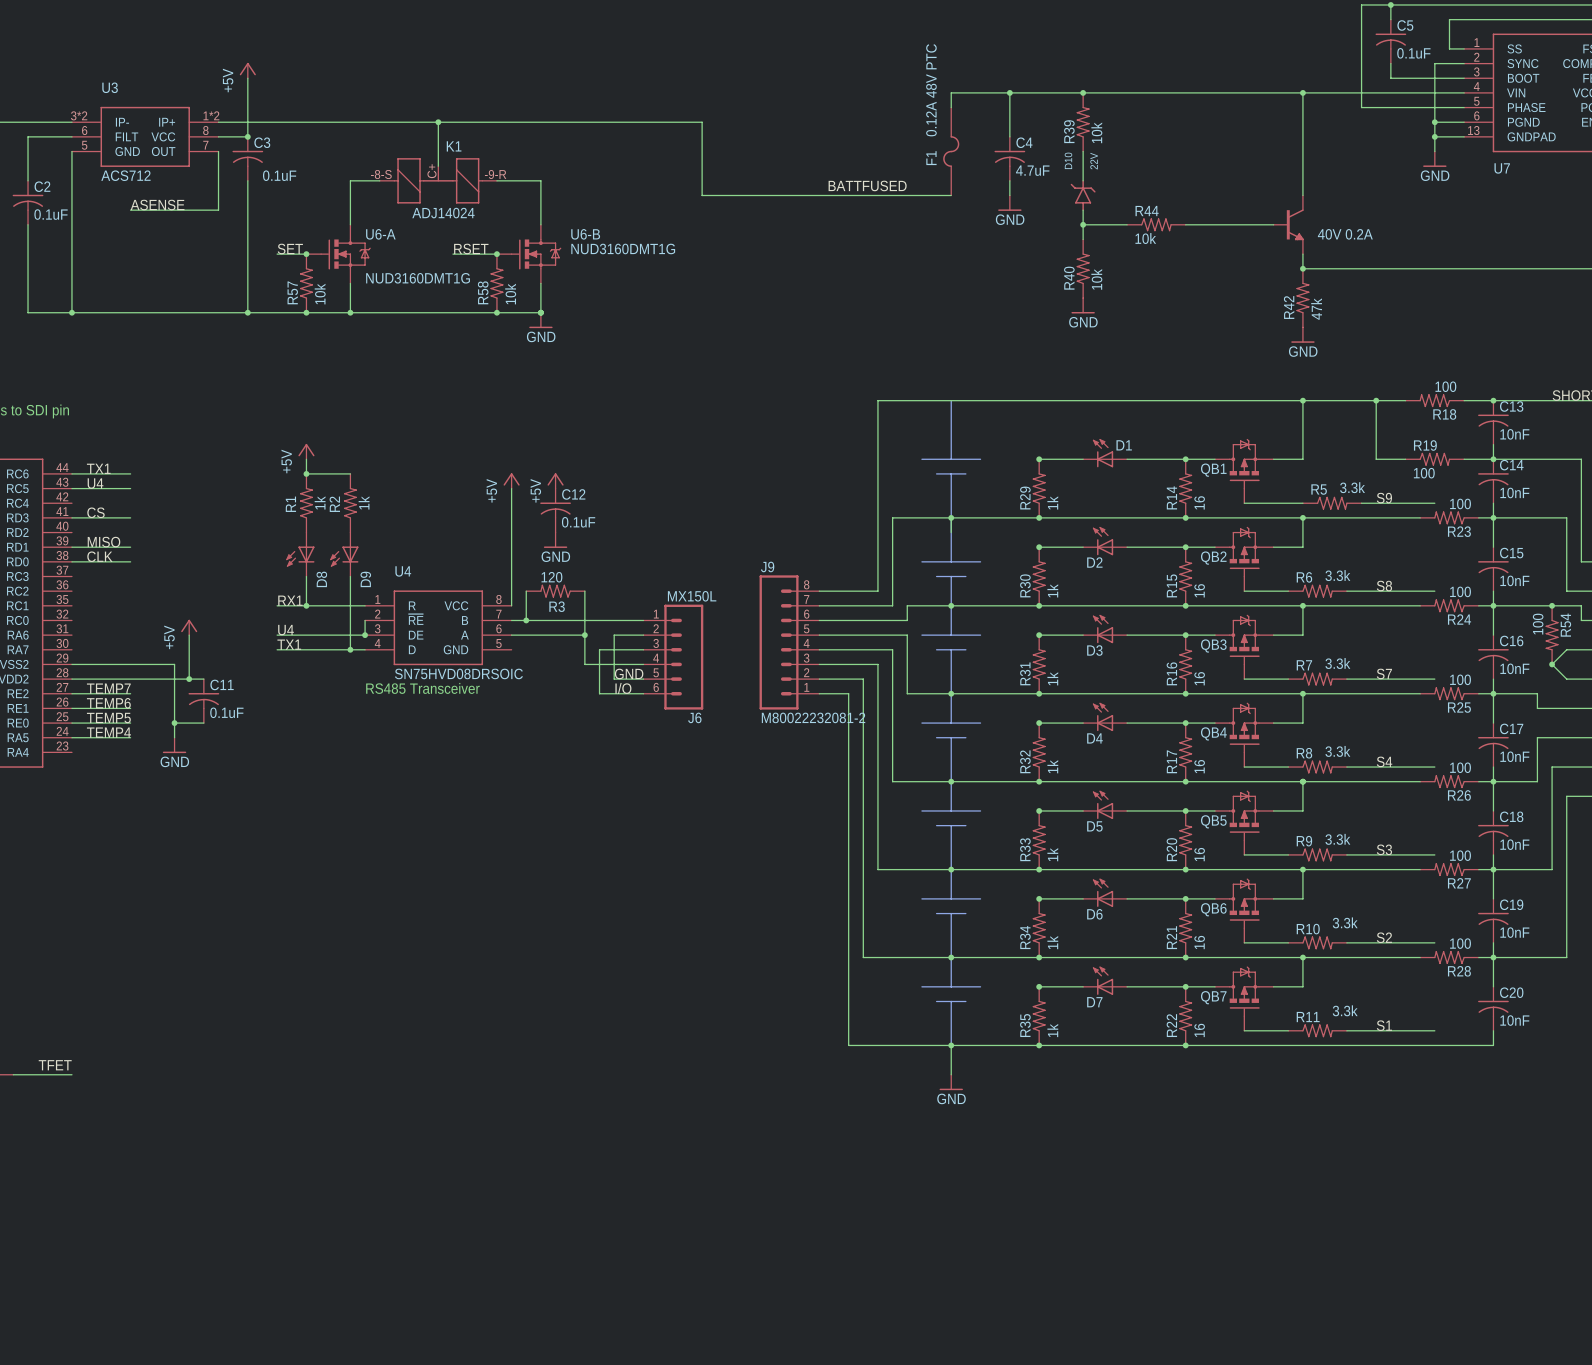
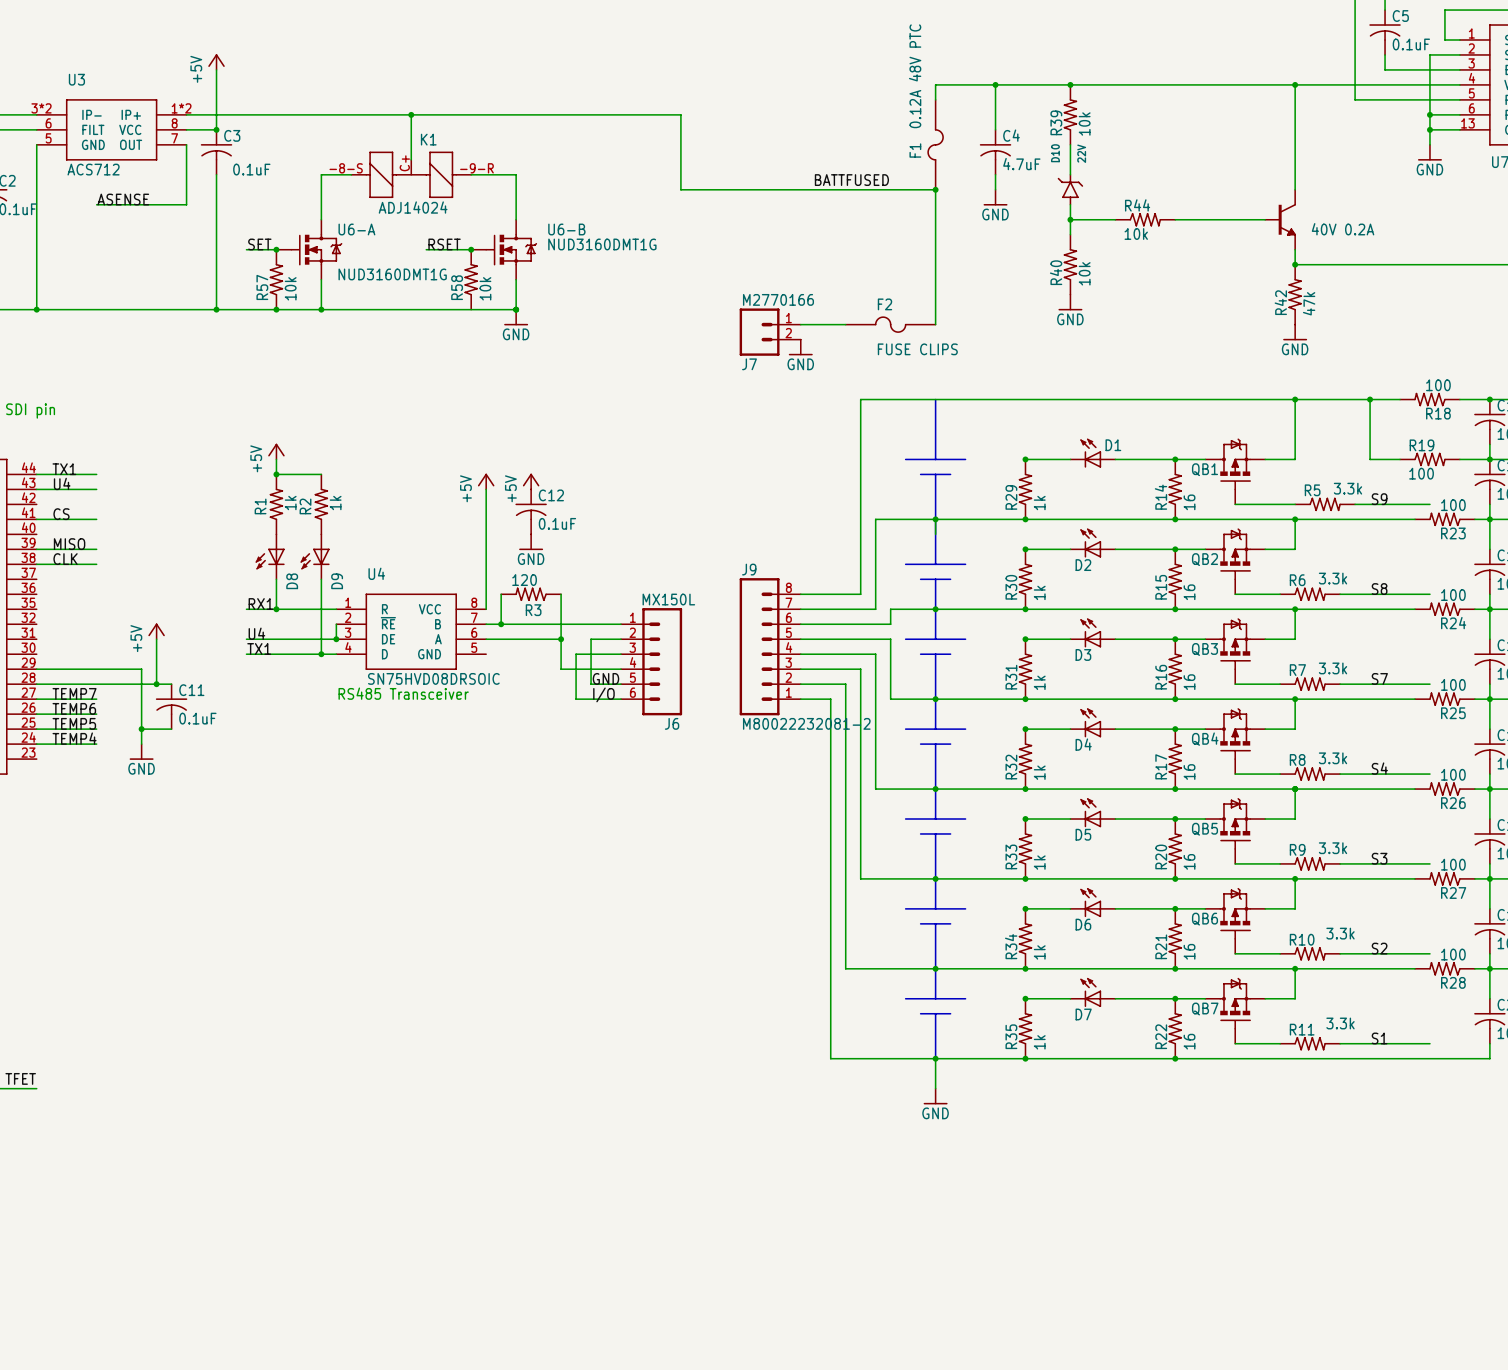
wire: none -> (935, 189) (935, 324)
junction: none -> (935, 189)
junction: (496, 312) -> none
wire: none -> (800, 324) (845, 324)
F2: none -> FUSE CLIPS (890, 324)
J7: none -> M2770166 (770, 332)
power symbol: none -> GND (800, 347)

